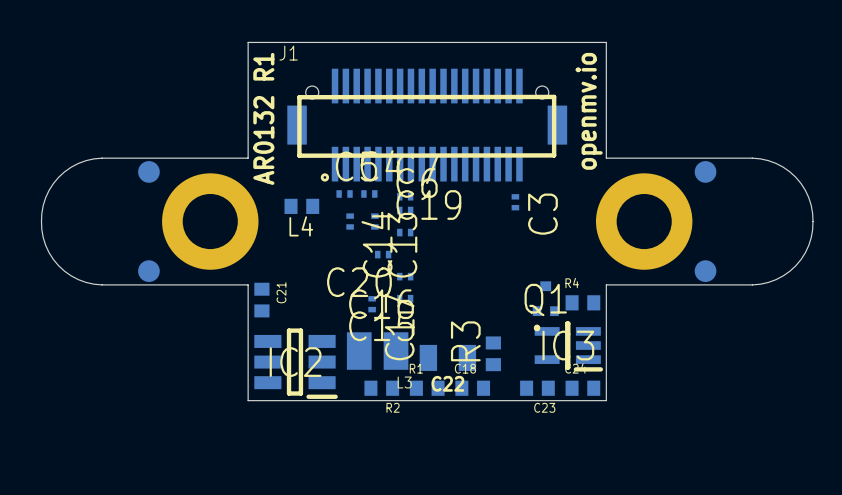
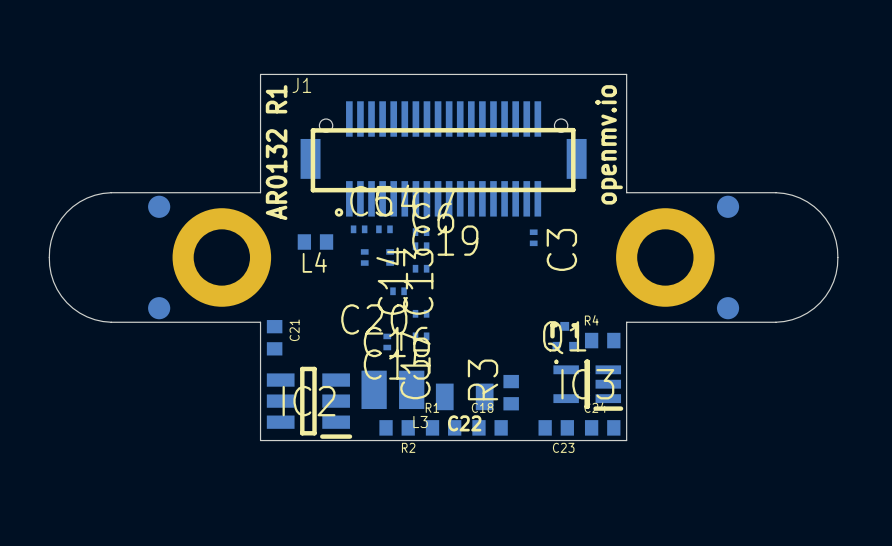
Q1 footprint: [532, 281, 559, 332] -> [550, 321, 580, 365]

